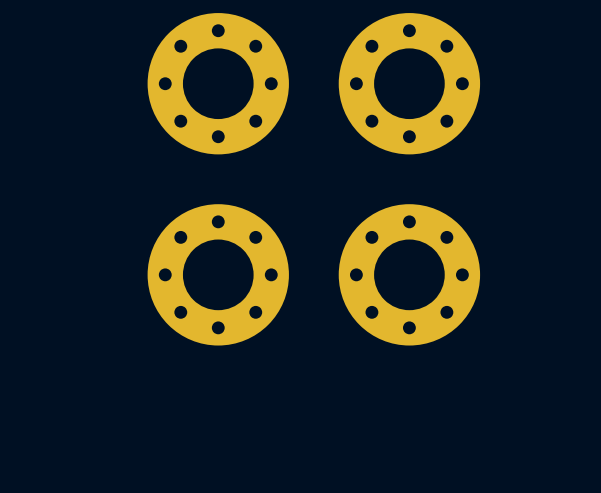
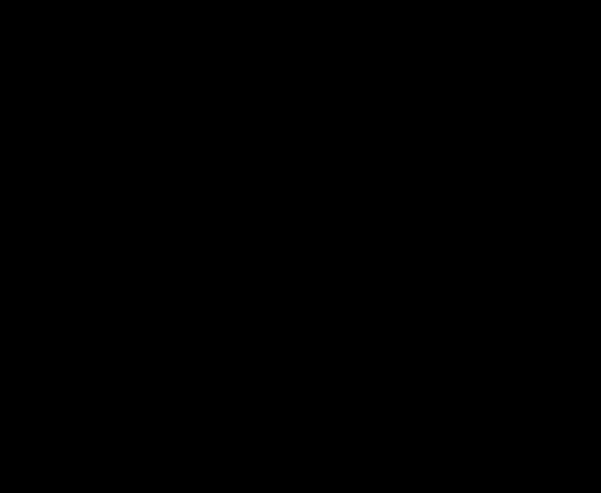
part: (218, 83) -> none
part: (409, 83) -> none
part: (218, 274) -> none
part: (409, 274) -> none

